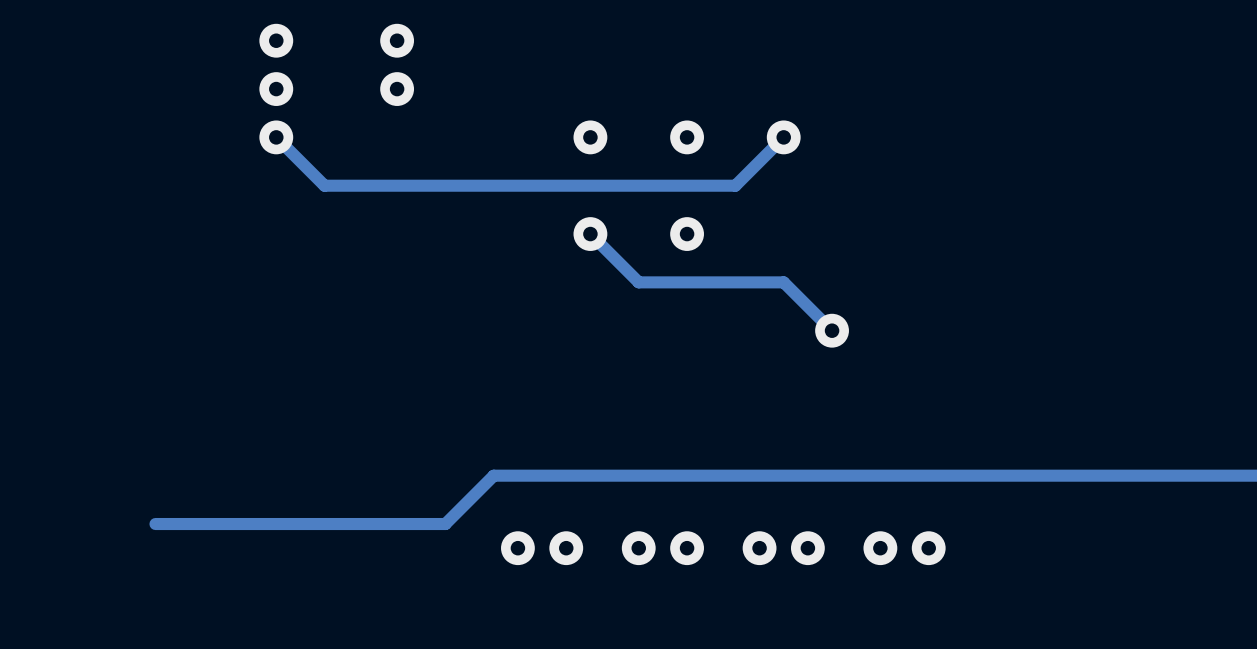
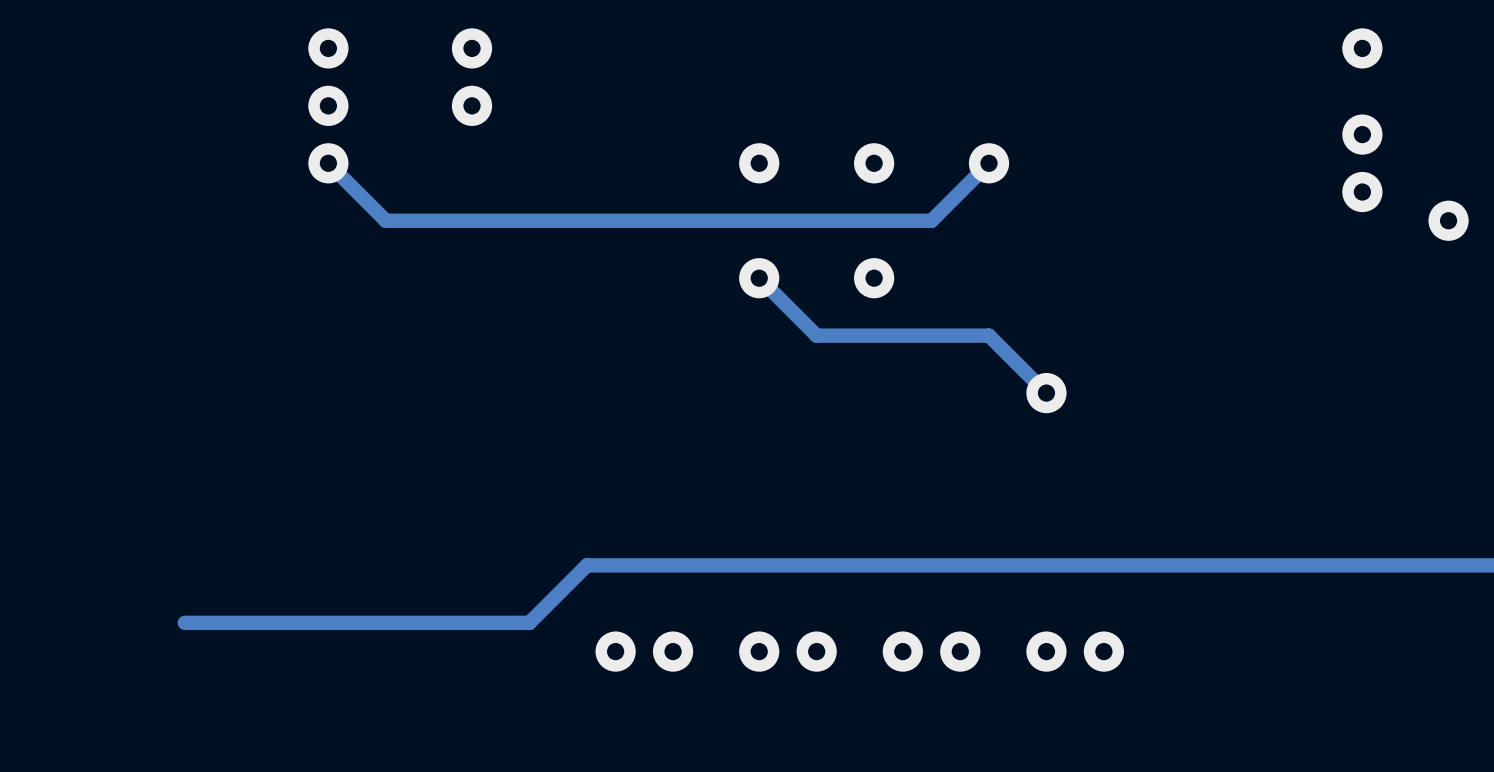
via: none -> (1362, 48)
via: none -> (1362, 134)
via: (590, 137) -> none
via: none -> (759, 163)
via: (687, 137) -> none
via: none -> (874, 163)
track: (783, 137) (735, 185) -> (989, 163) (931, 220) (874, 220)
via: (783, 137) -> none
via: none -> (989, 163)
via: none -> (1362, 192)
via: none -> (1448, 220)
track: (590, 234) (638, 282) (687, 282) -> (759, 278) (816, 335)
via: (590, 234) -> none
via: none -> (759, 278)
via: (687, 234) -> none
via: none -> (874, 278)
track: (783, 282) (832, 330) -> (931, 335) (989, 335) (1046, 393)
via position: (832, 330) -> (1046, 393)

